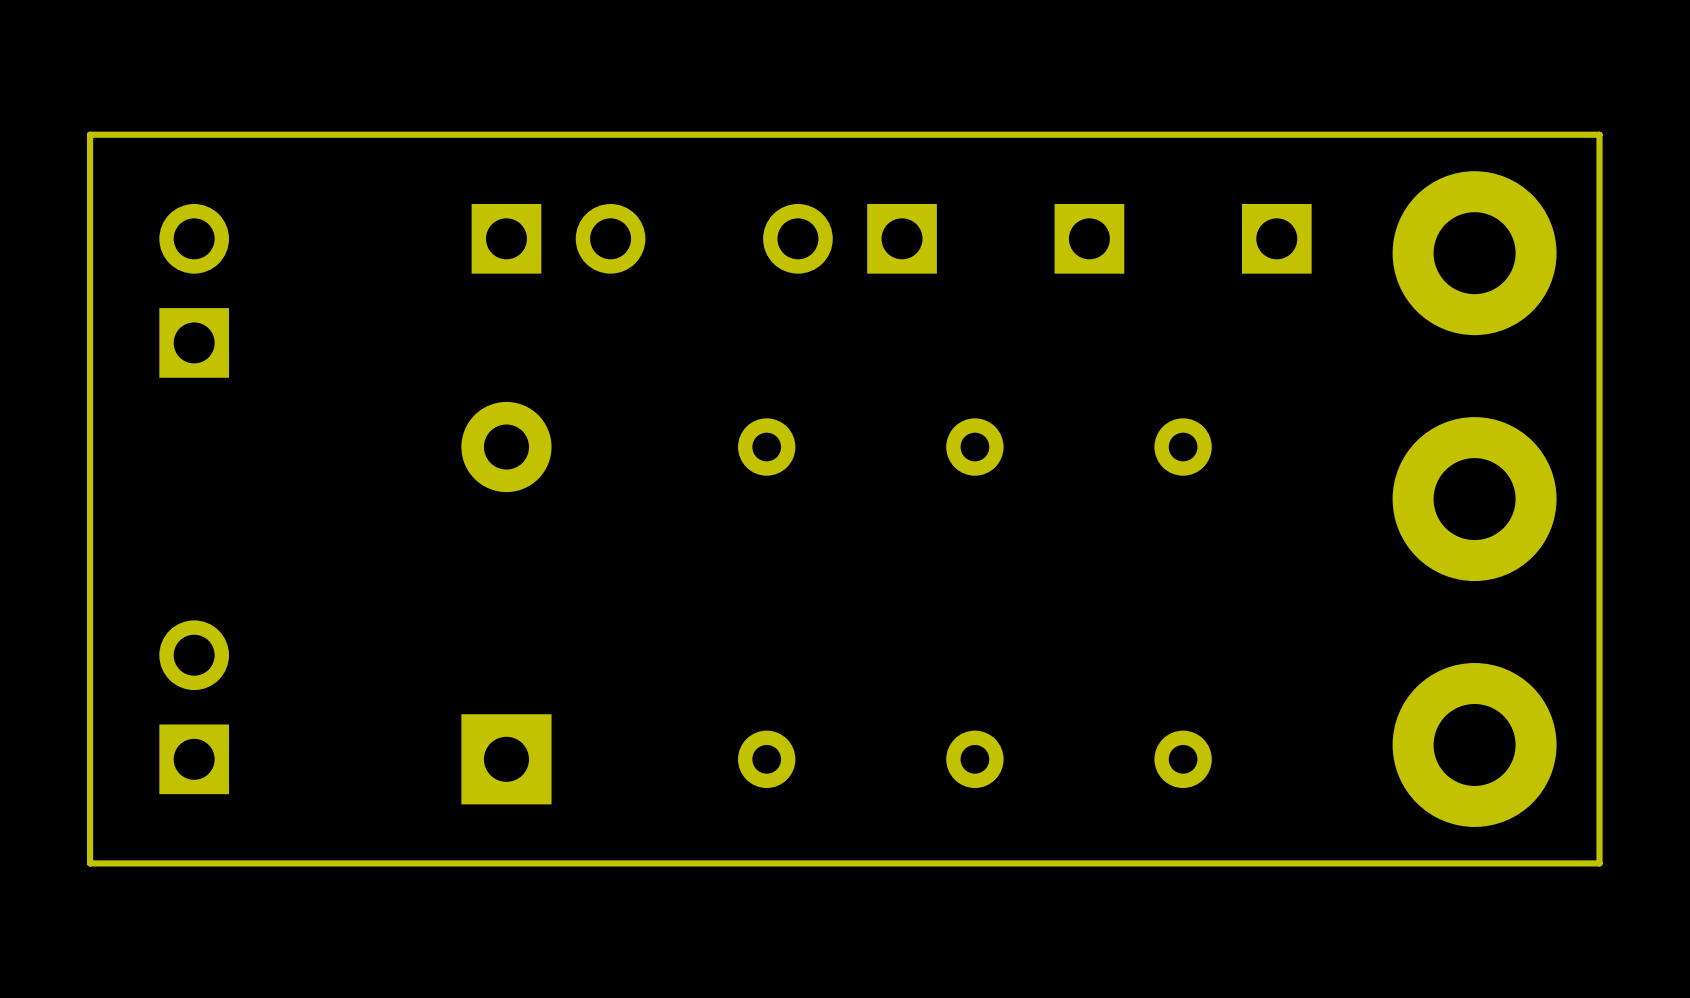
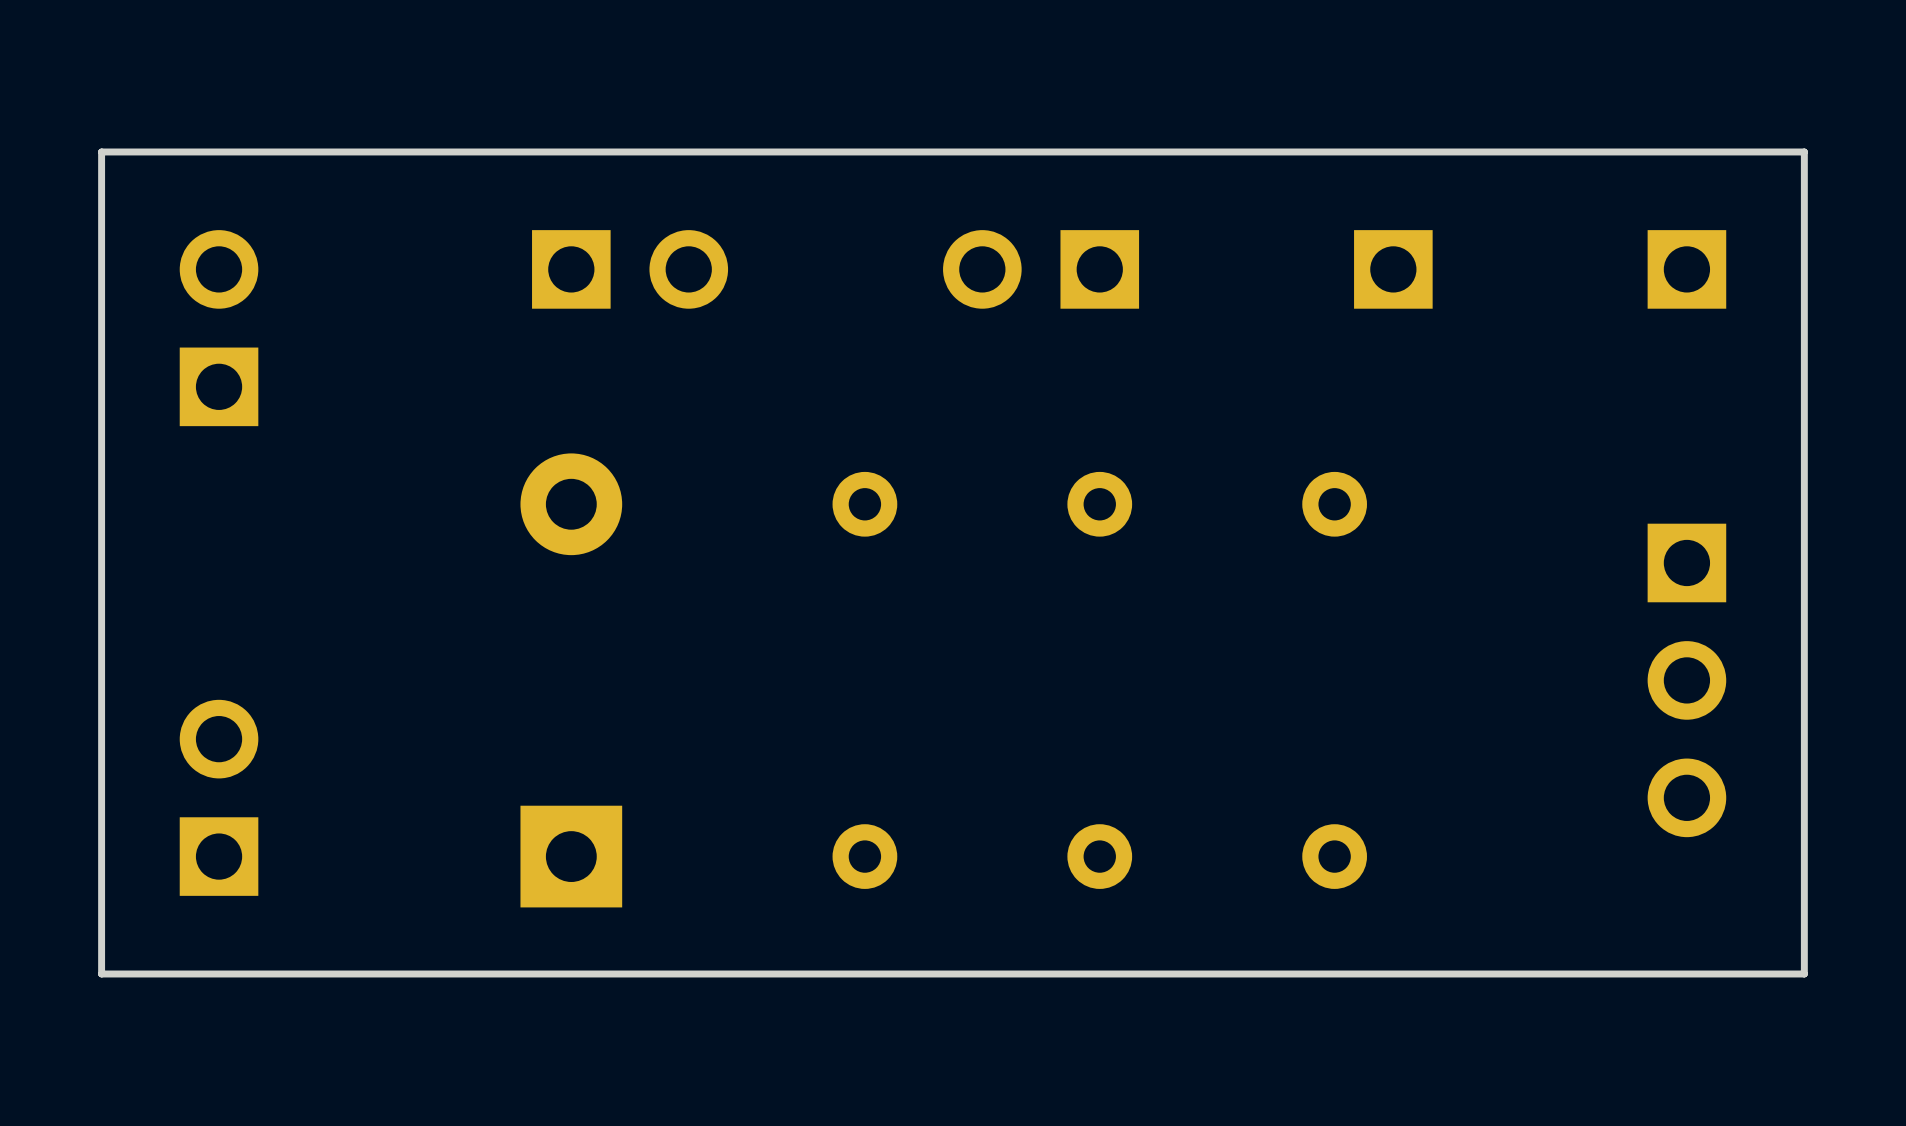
part position: (849, 238) -> (1041, 269)
part: (1089, 238) -> none
part position: (1276, 238) -> (1393, 269)
part: none -> (1686, 269)
part: (1474, 499) -> none
part: none -> (1686, 680)

